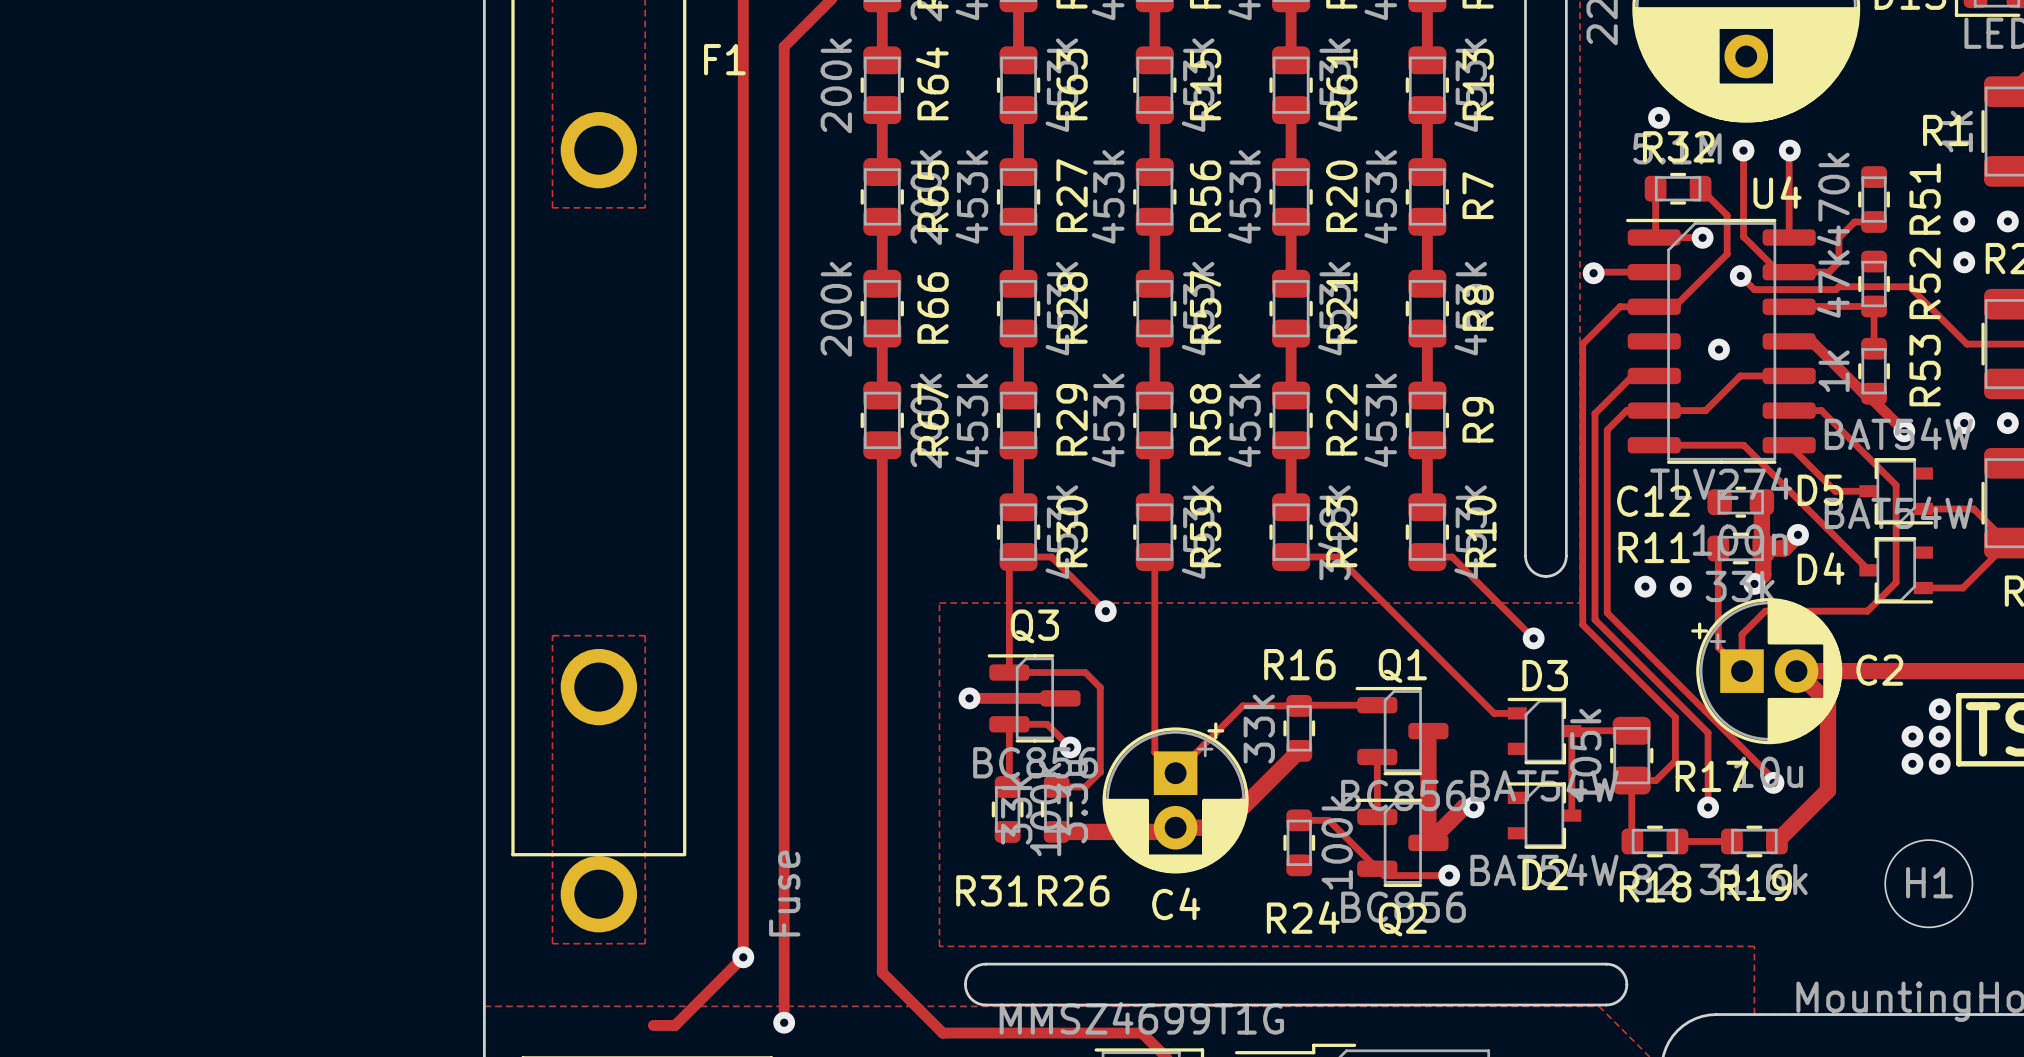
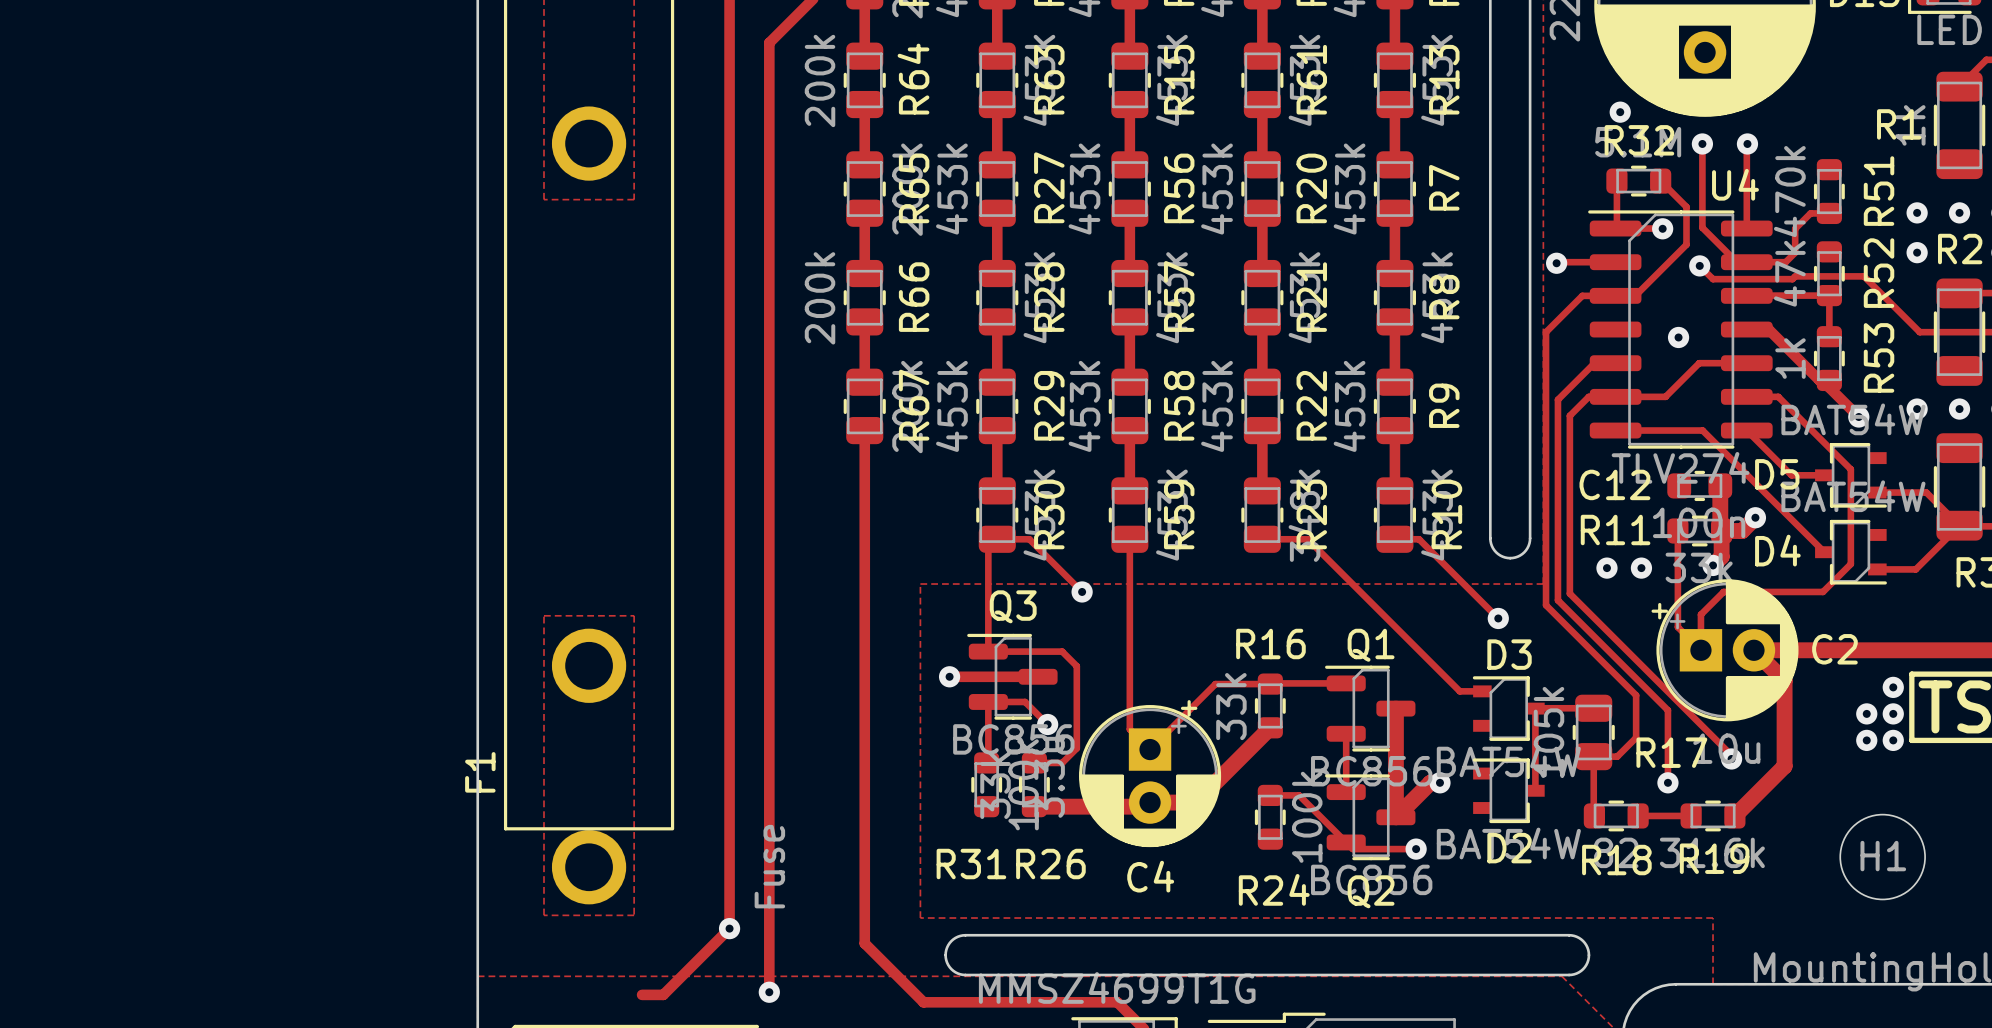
F1 name rotation: 0° (724, 59) -> 90° counterclockwise (480, 772)
F1 name position: F1 (724, 59) -> F1 (480, 772)

